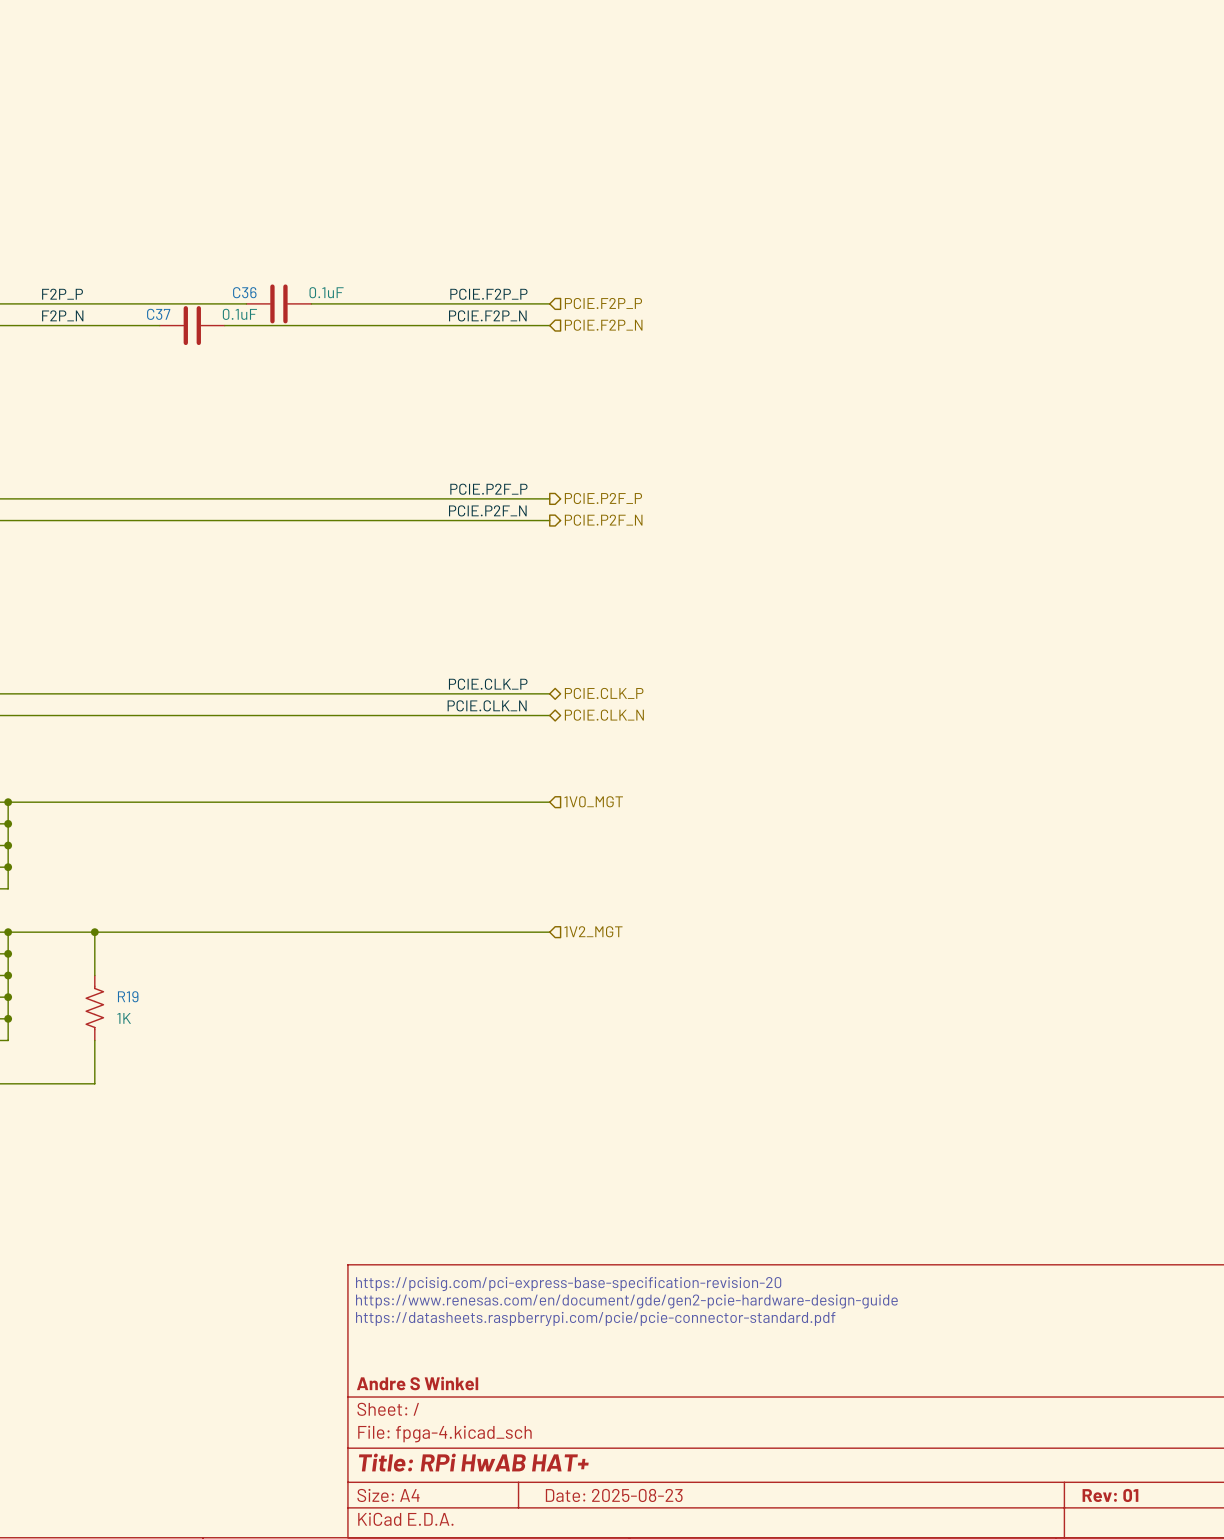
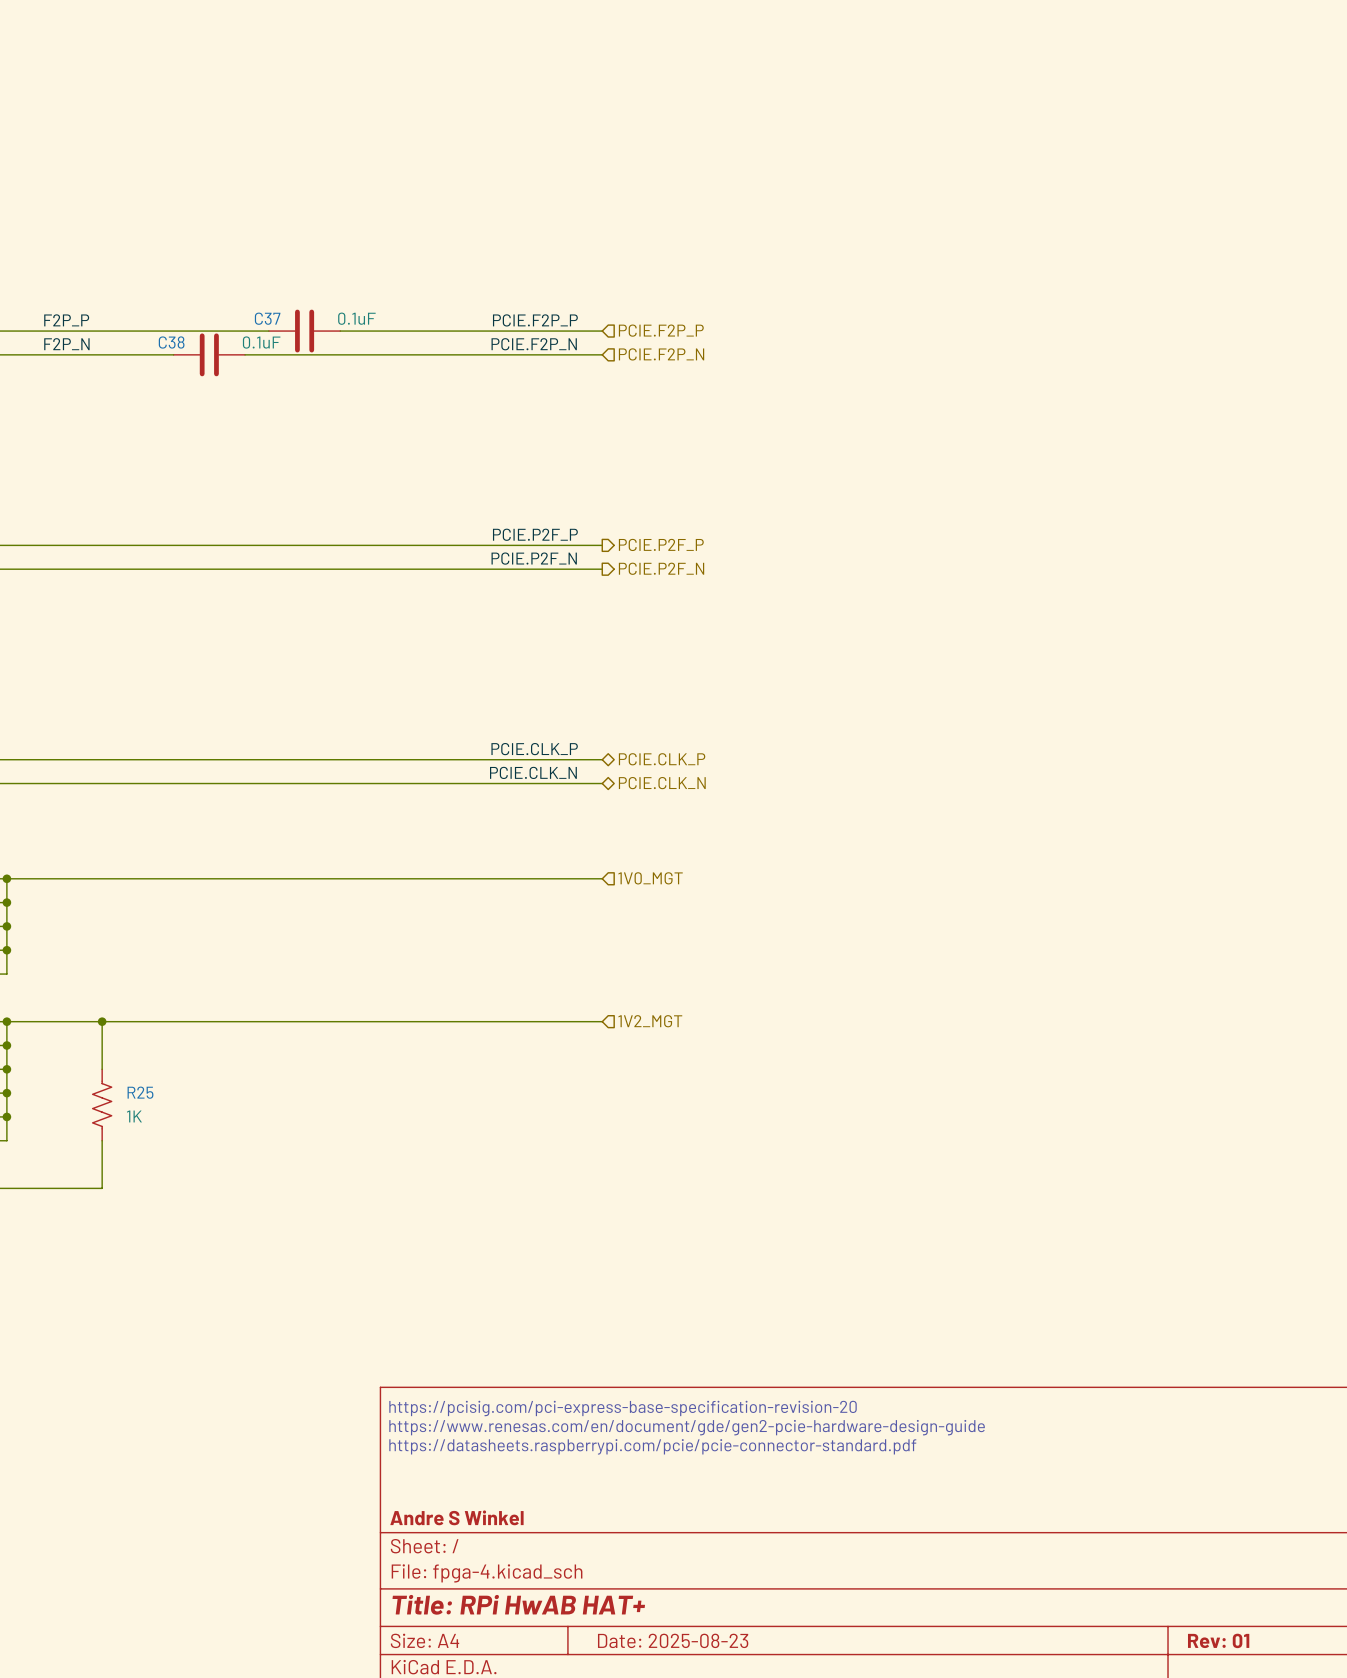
C36 name: C36 (244, 292) -> C37 (267, 318)
C37 name: C37 (158, 314) -> C38 (171, 342)
R19 name: R19 (128, 996) -> R25 (140, 1092)

